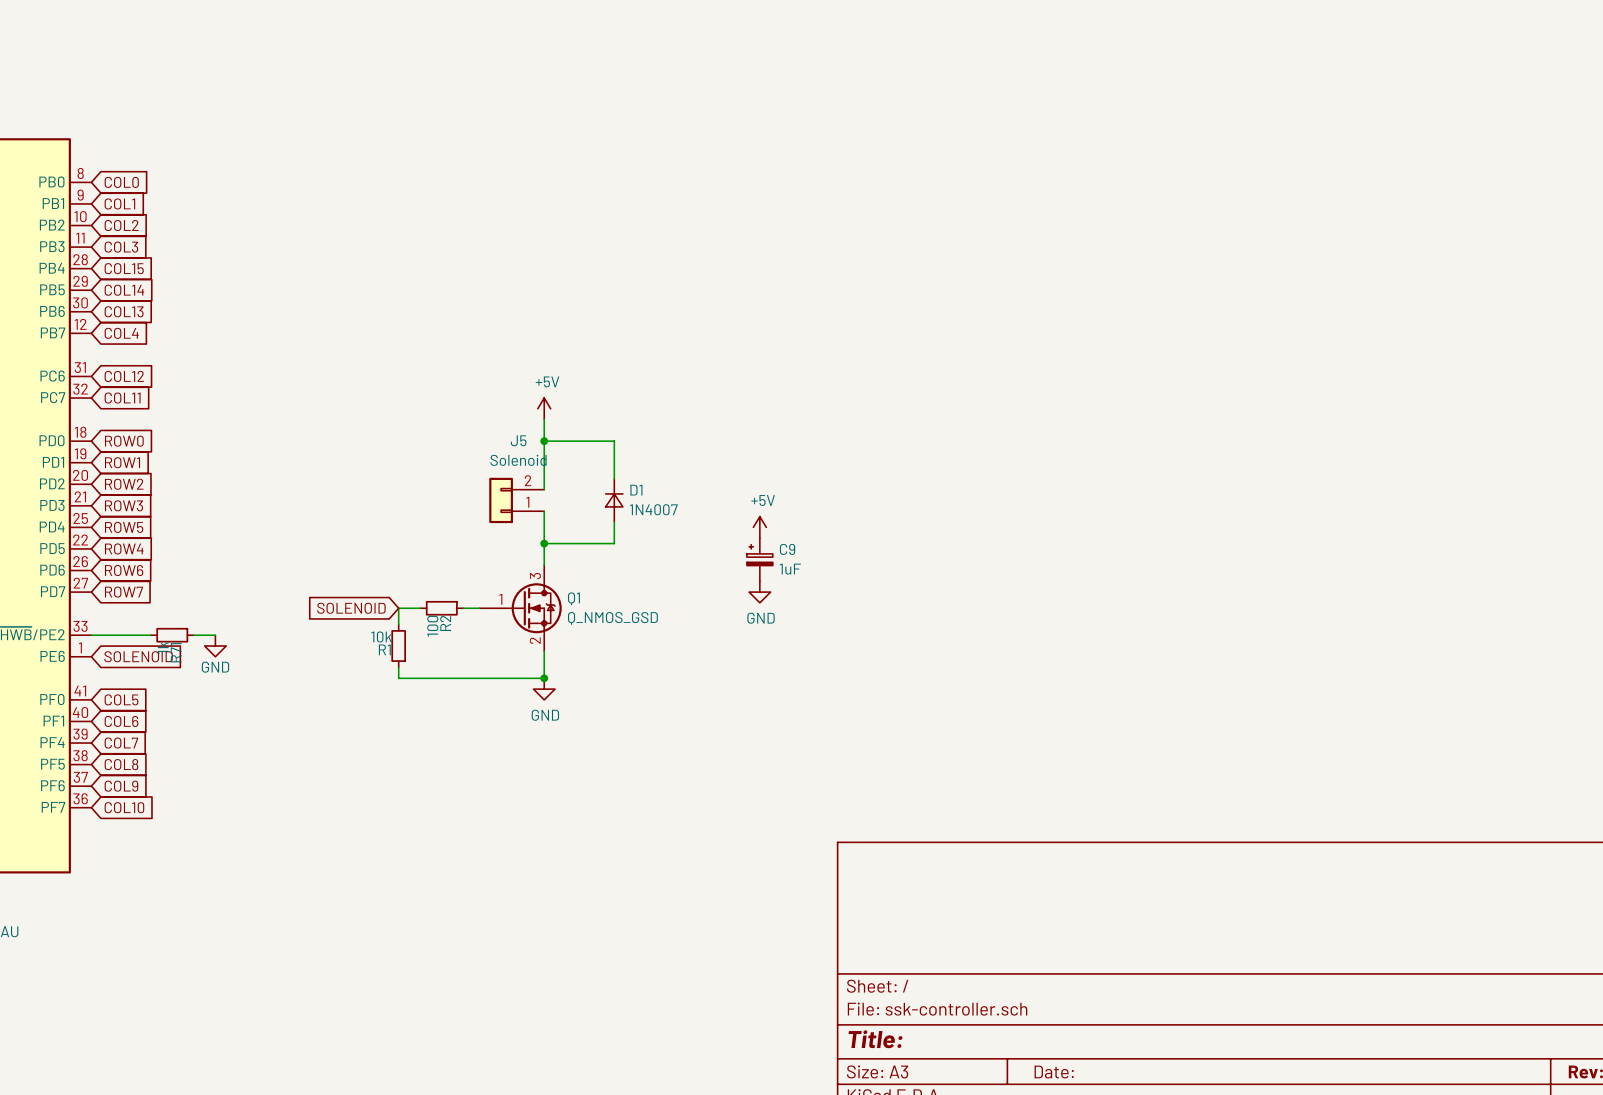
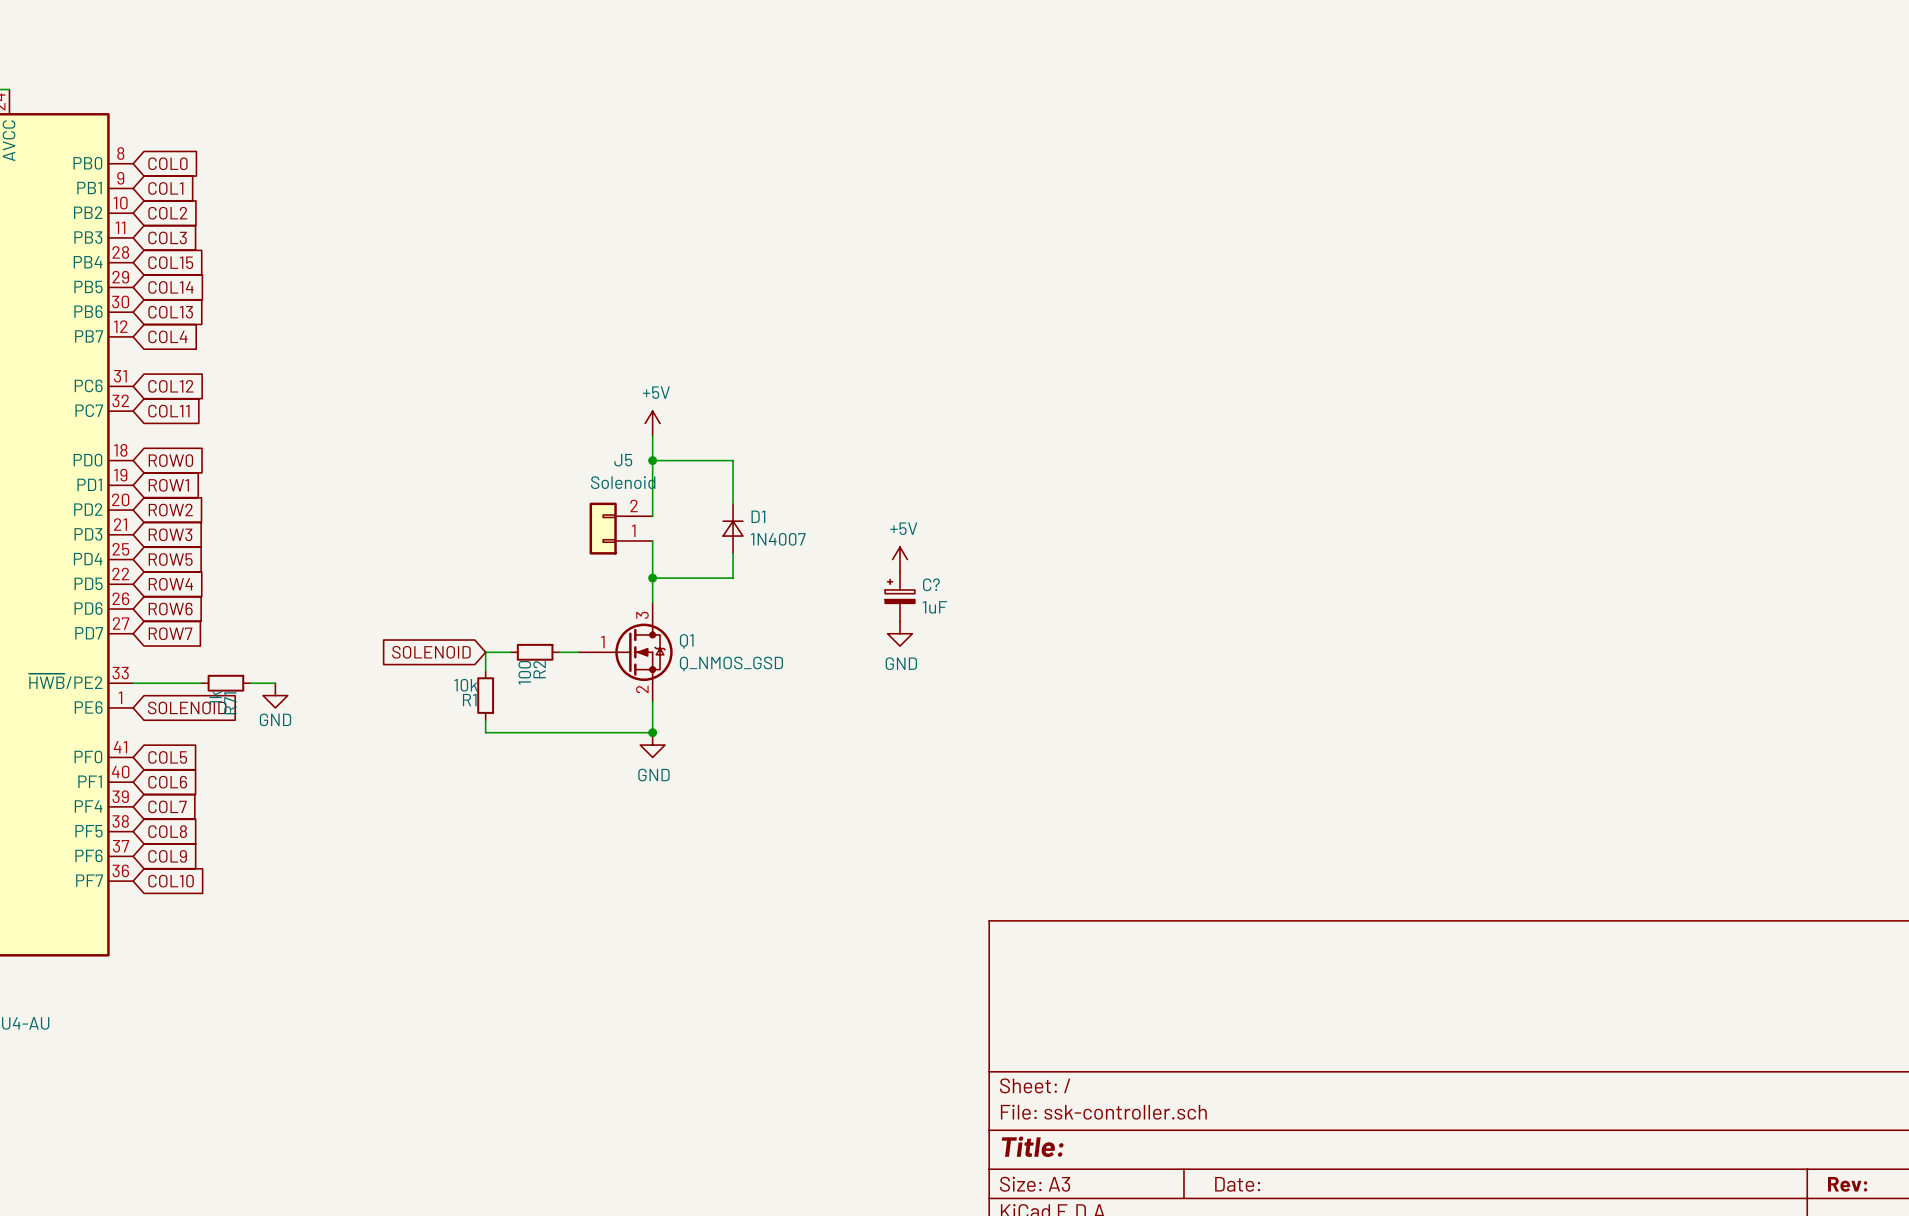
C9 name: C9 (787, 549) -> C? (931, 584)

